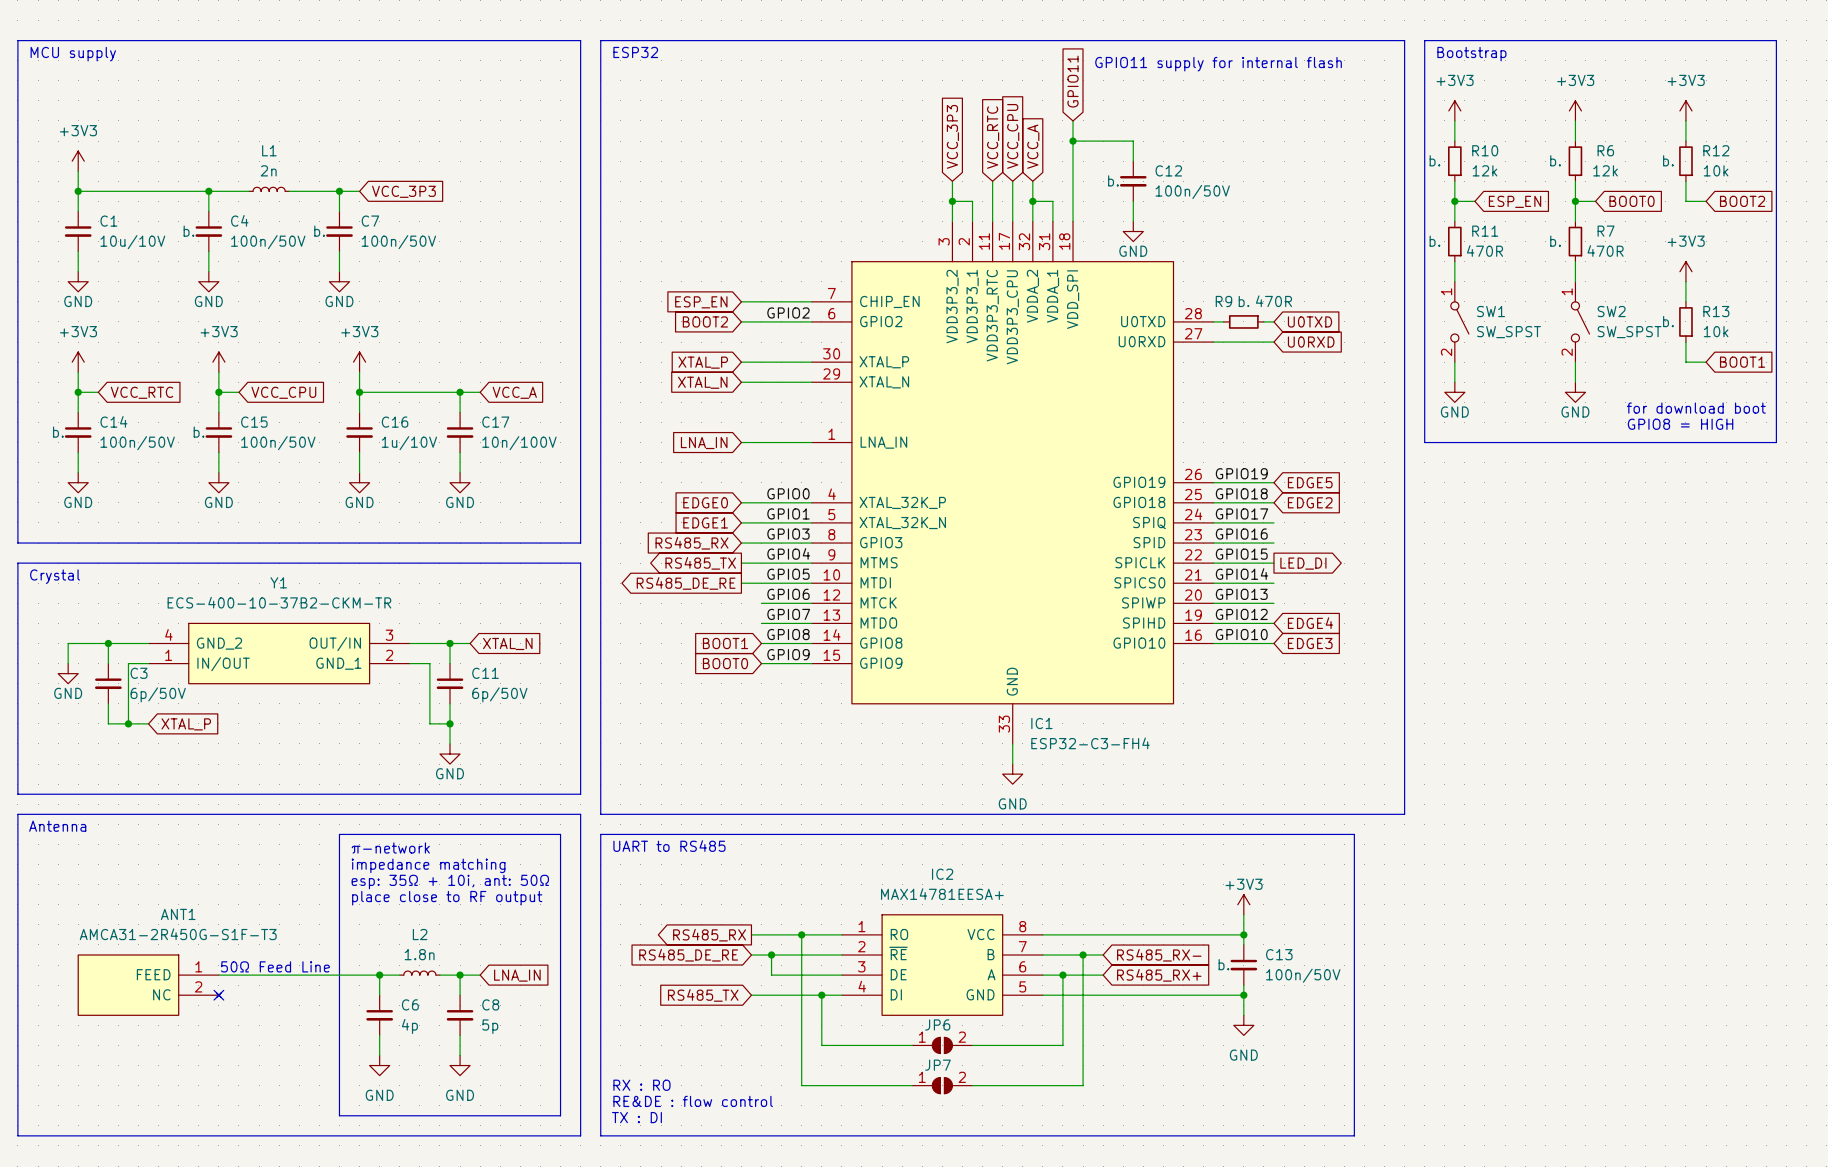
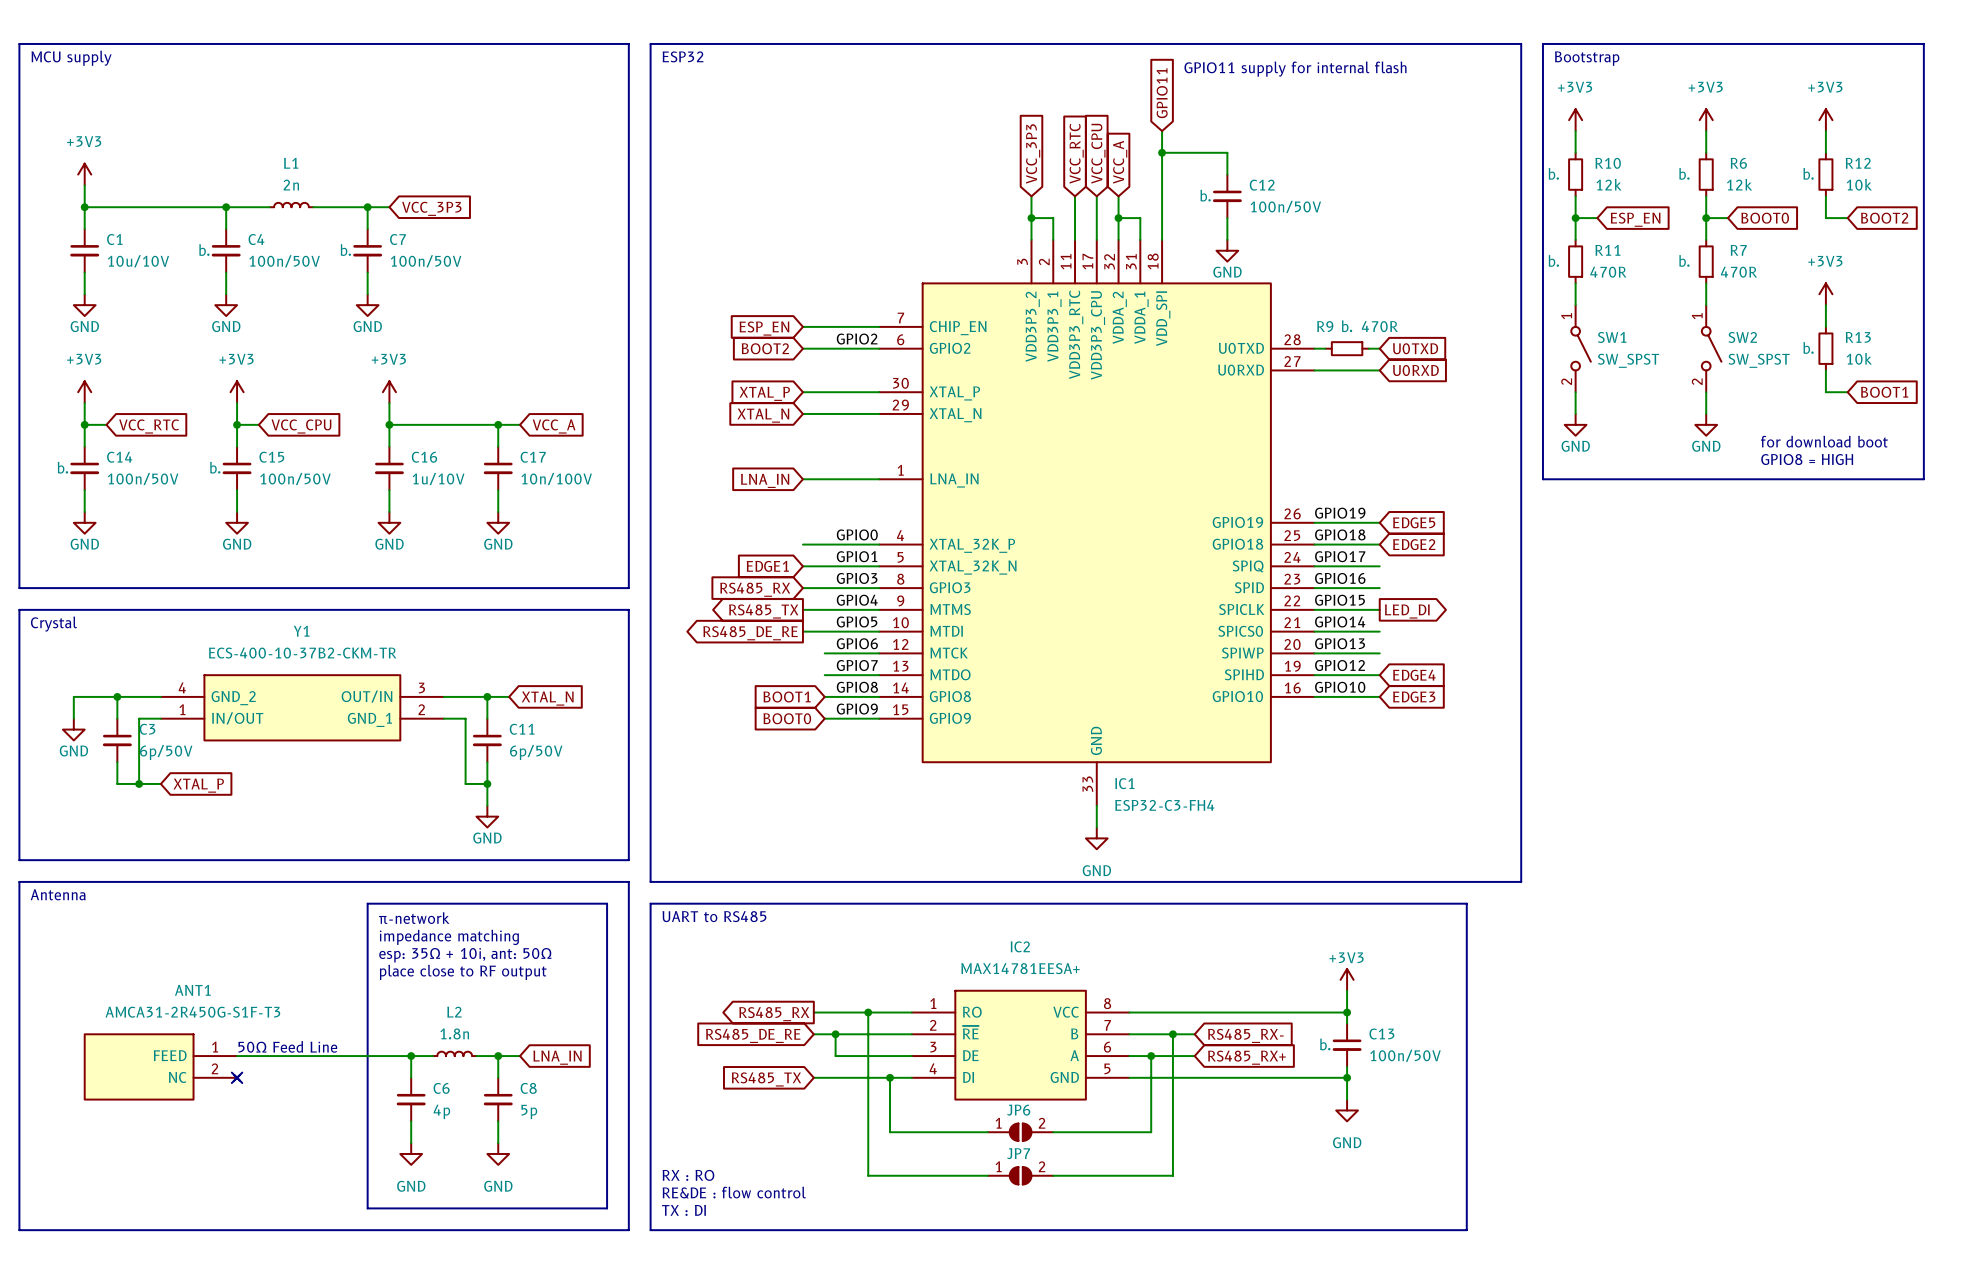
global label: EDGE0 (705, 502) -> none

